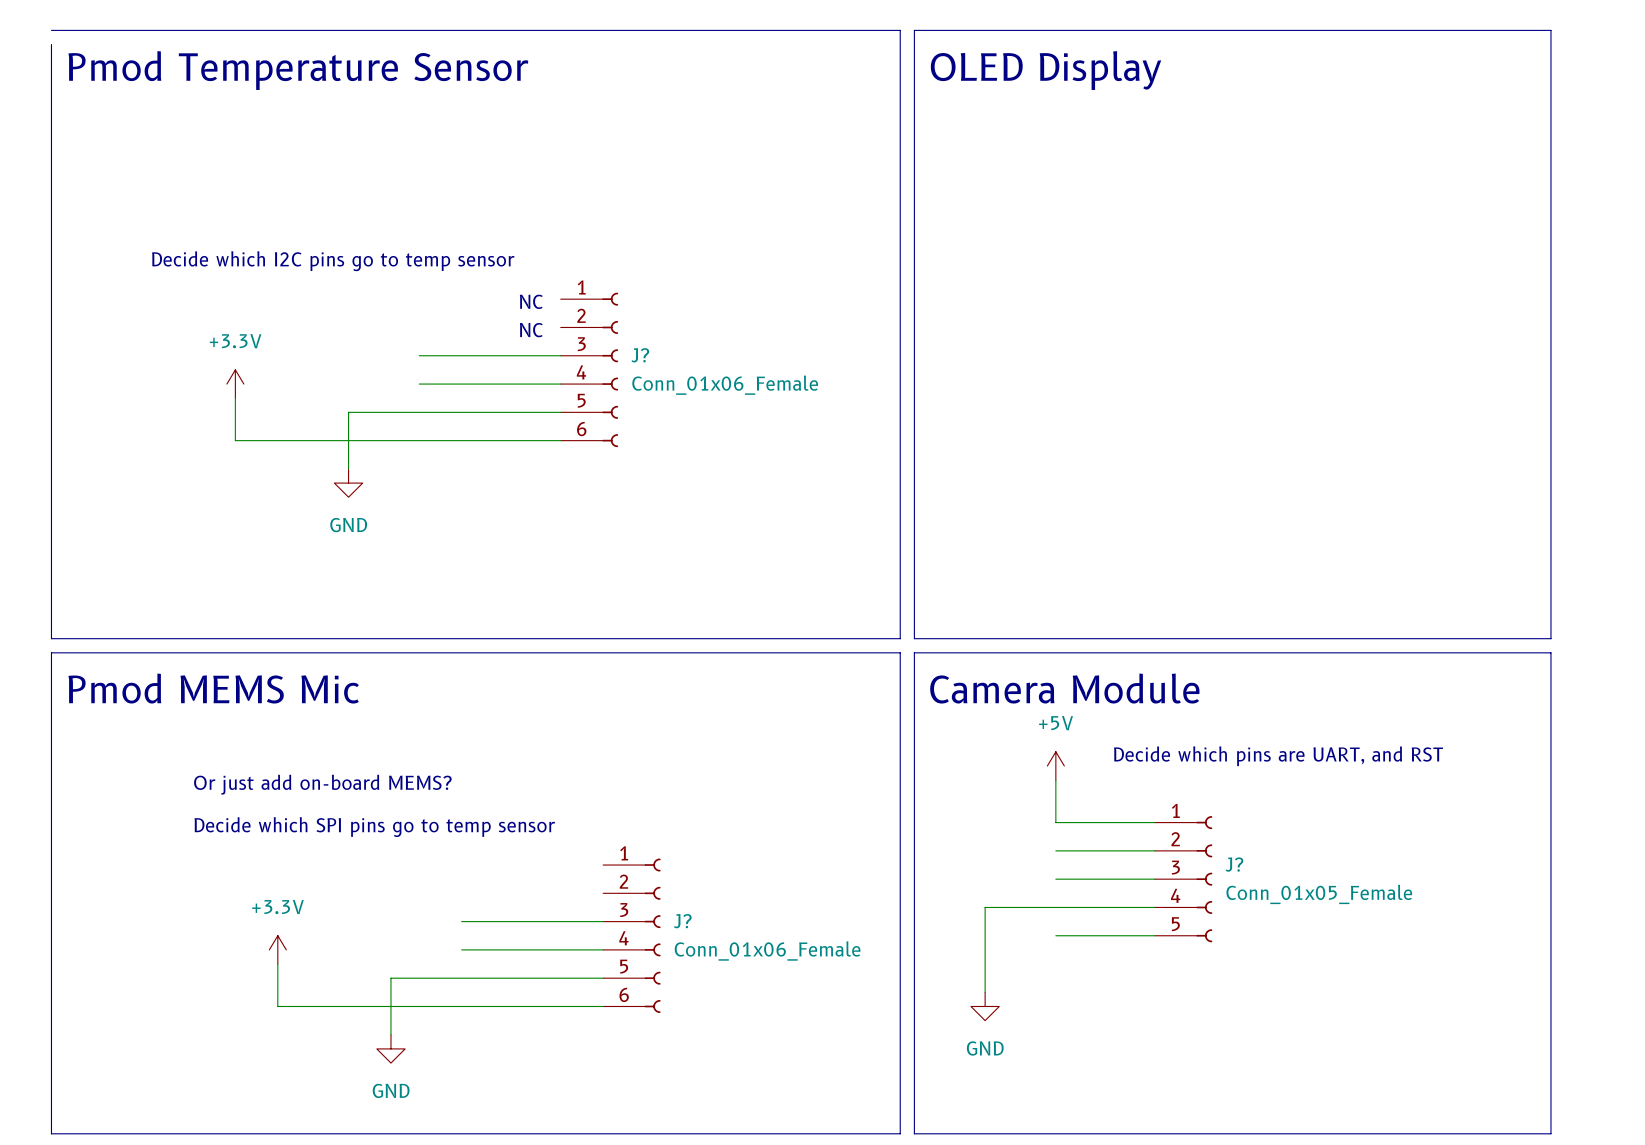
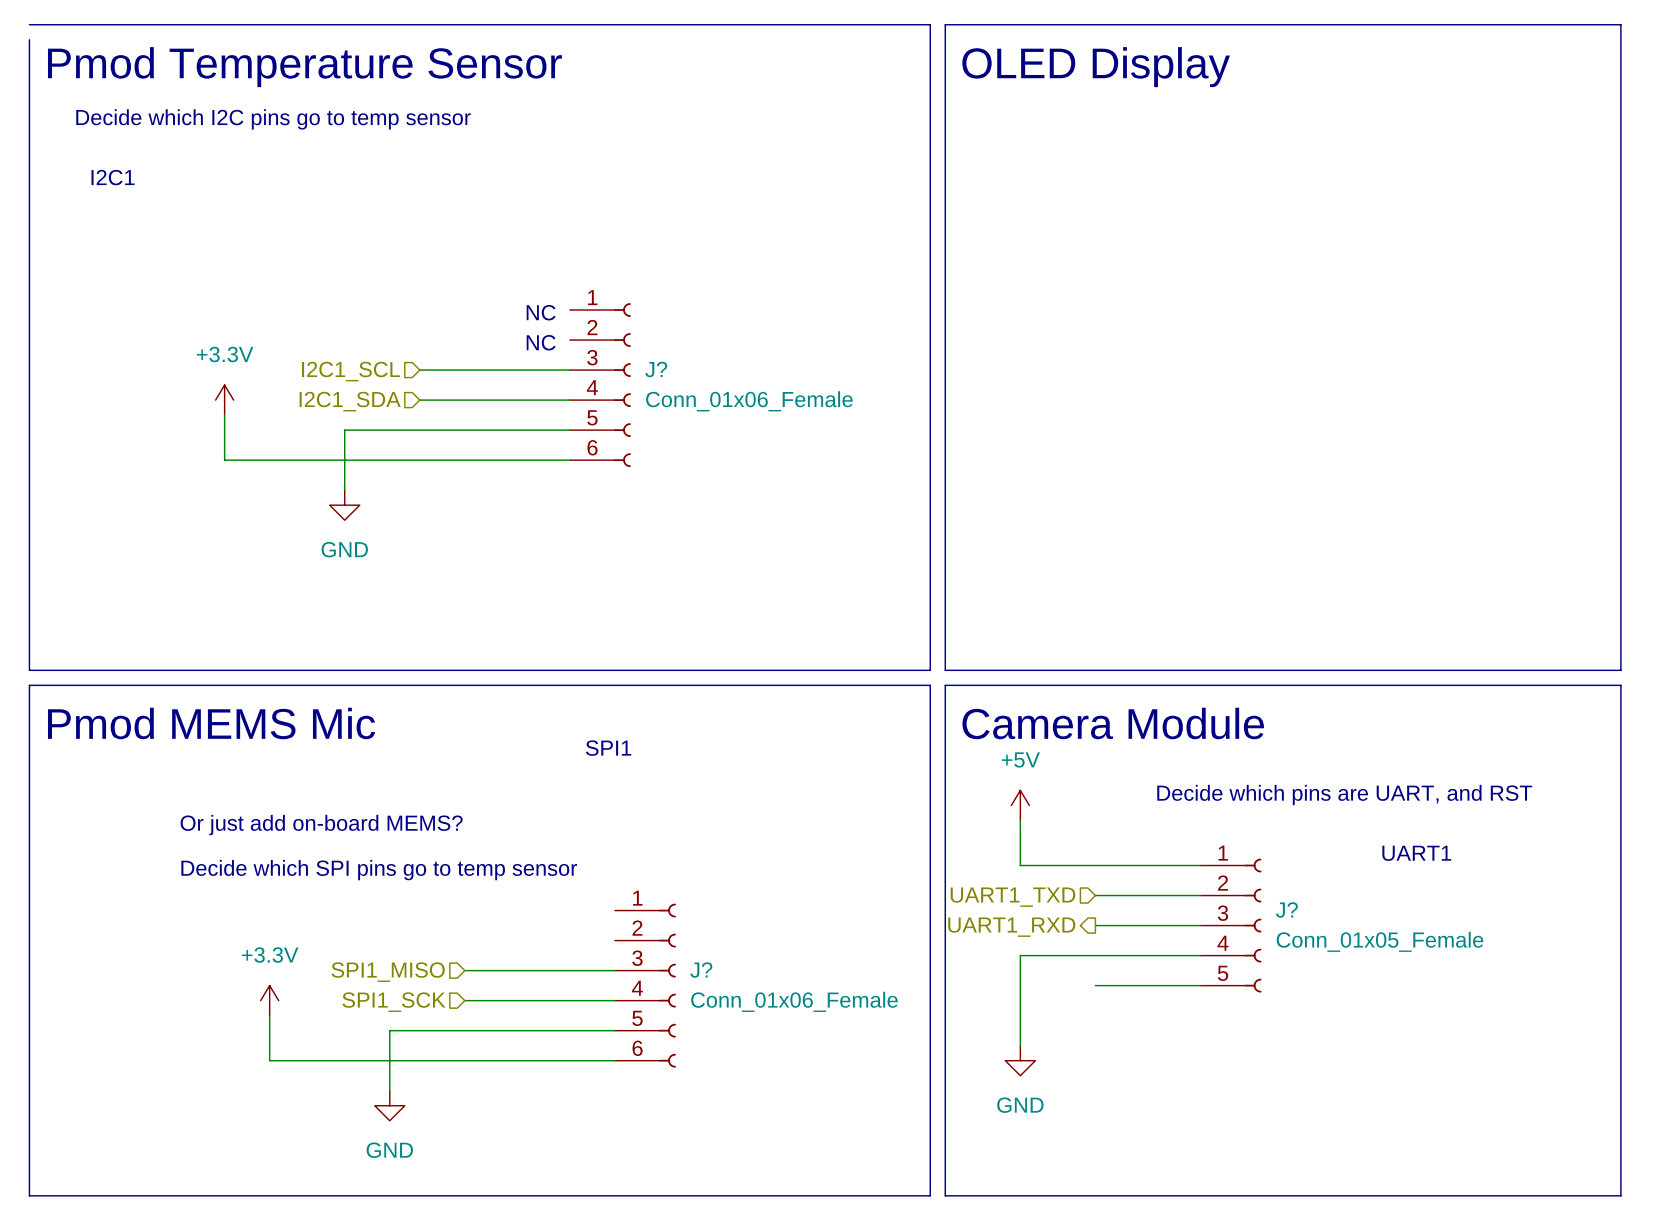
text: none -> I2C1 (113, 177)
text position: Decide which I2C pins go to temp sensor (333, 261) -> Decide which I2C pins go to temp sensor (273, 119)
hierarchical label: none -> I2C1_SCL (351, 371)
hierarchical label: none -> I2C1_SDA (350, 401)
text: none -> SPI1 (608, 748)
power symbol position: +5V (1055, 766) -> +5V (1020, 805)
wire: (1055, 780) (1055, 822) -> (1020, 820) (1020, 865) (1095, 865)
text: none -> UART1 (1416, 853)
hierarchical label: none -> UART1_TXD (1013, 897)
hierarchical label: none -> UART1_RXD (1011, 927)
hierarchical label: none -> SPI1_MISO (388, 972)
hierarchical label: none -> SPI1_SCK (393, 1002)

